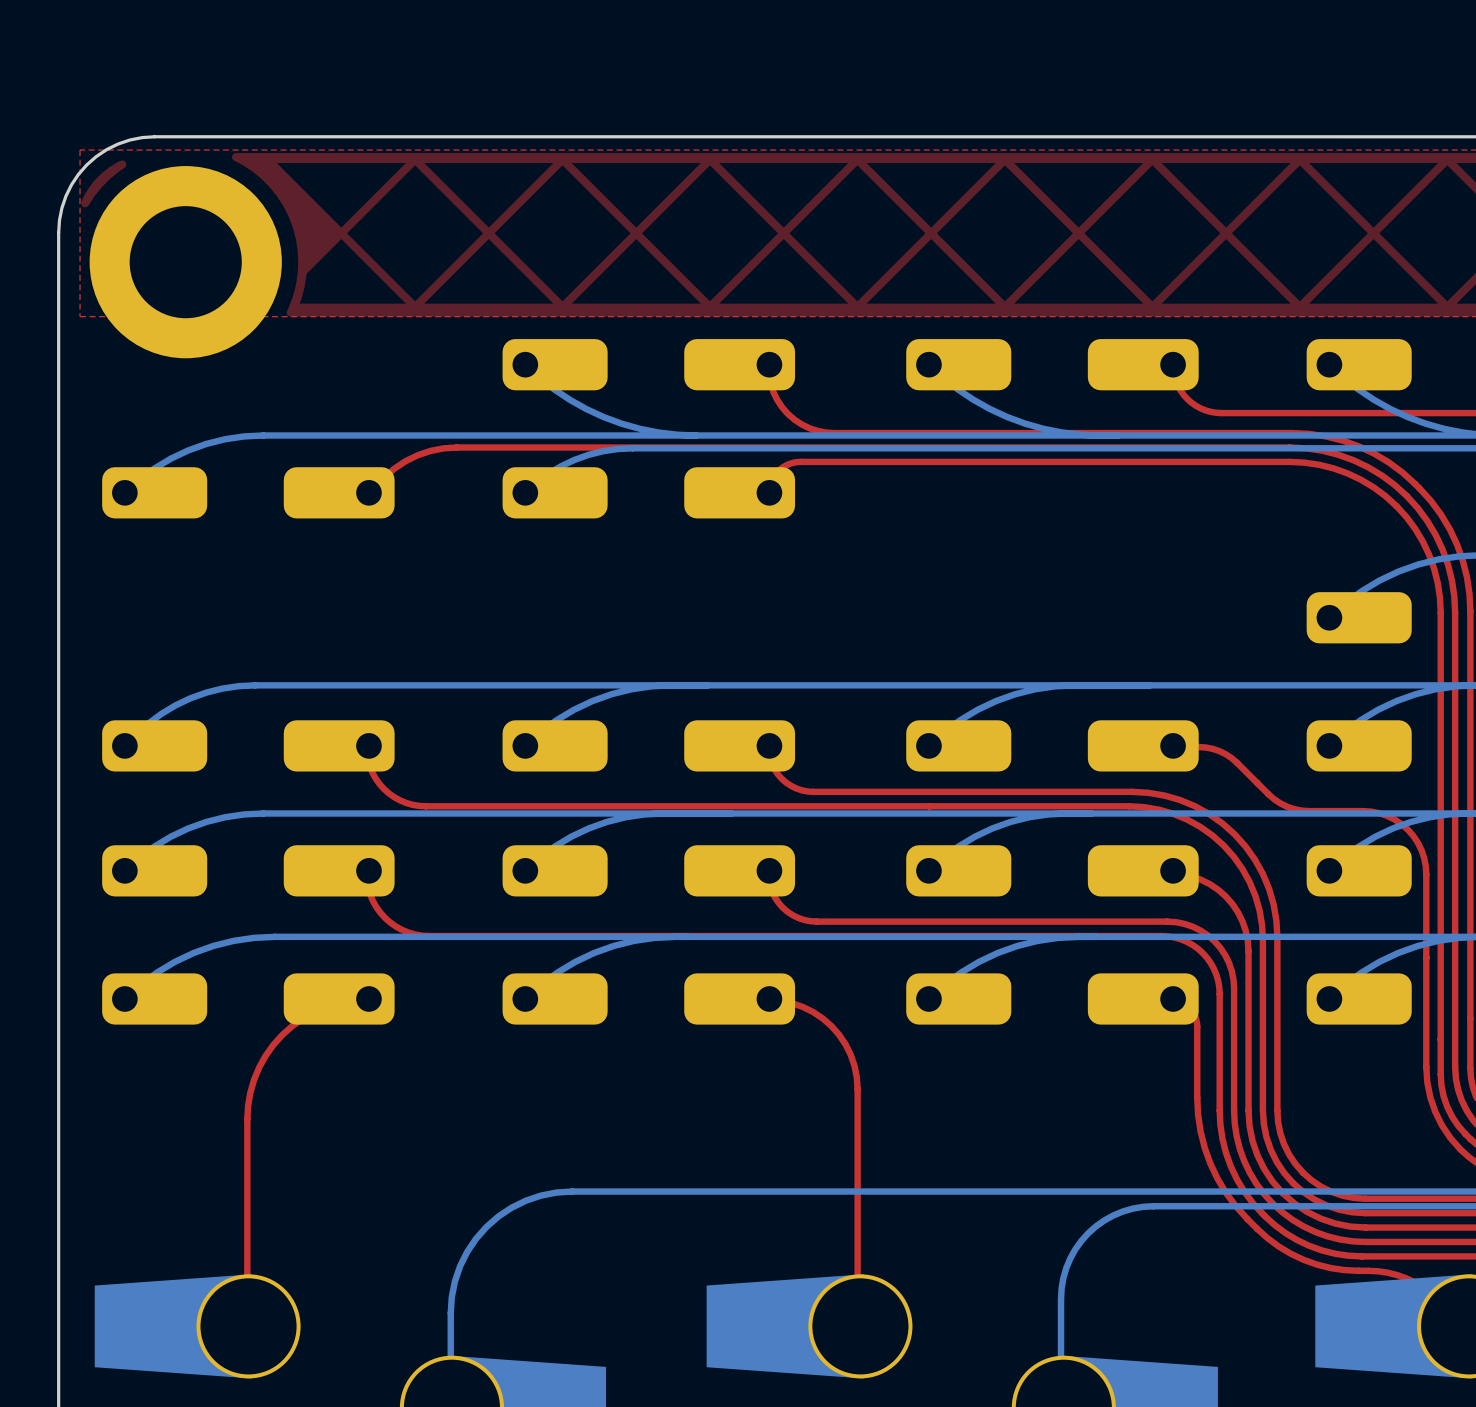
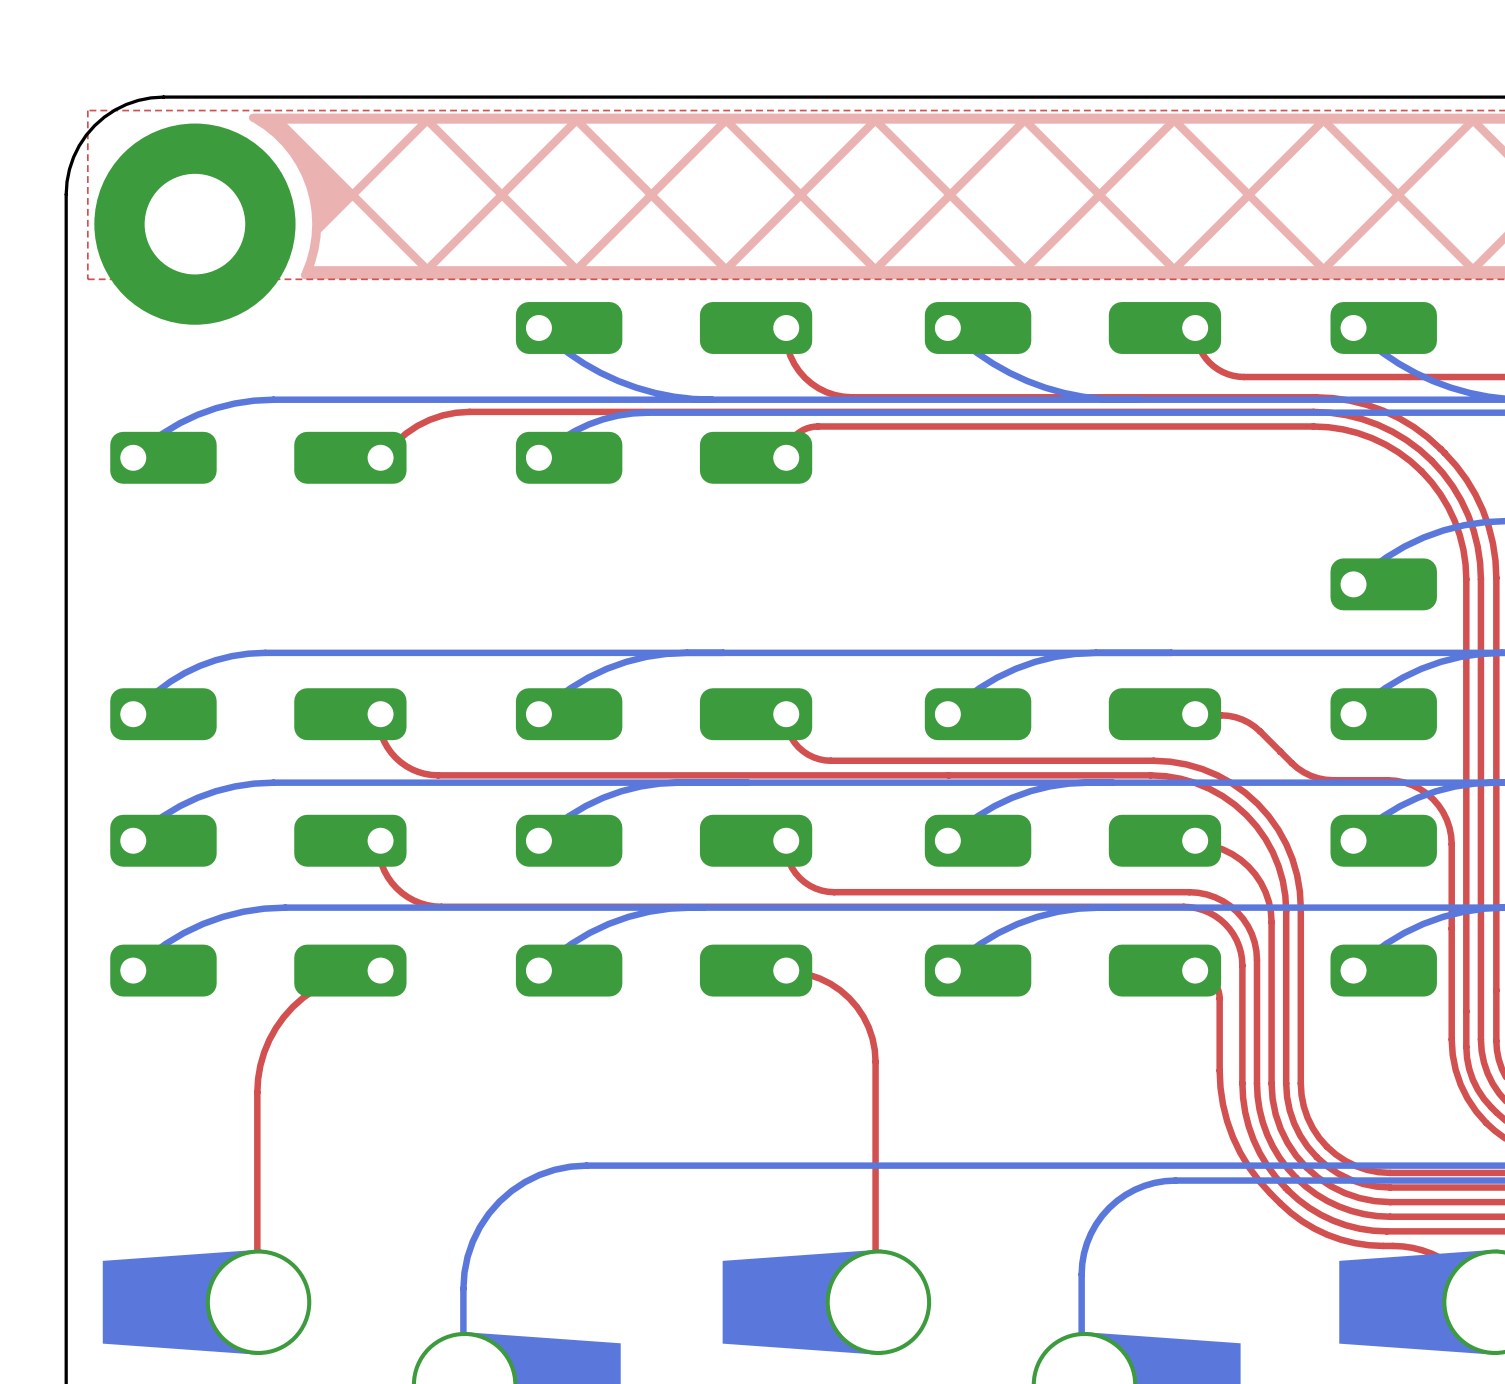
part footprint: [89, 166, 282, 359] -> [94, 123, 296, 325]

